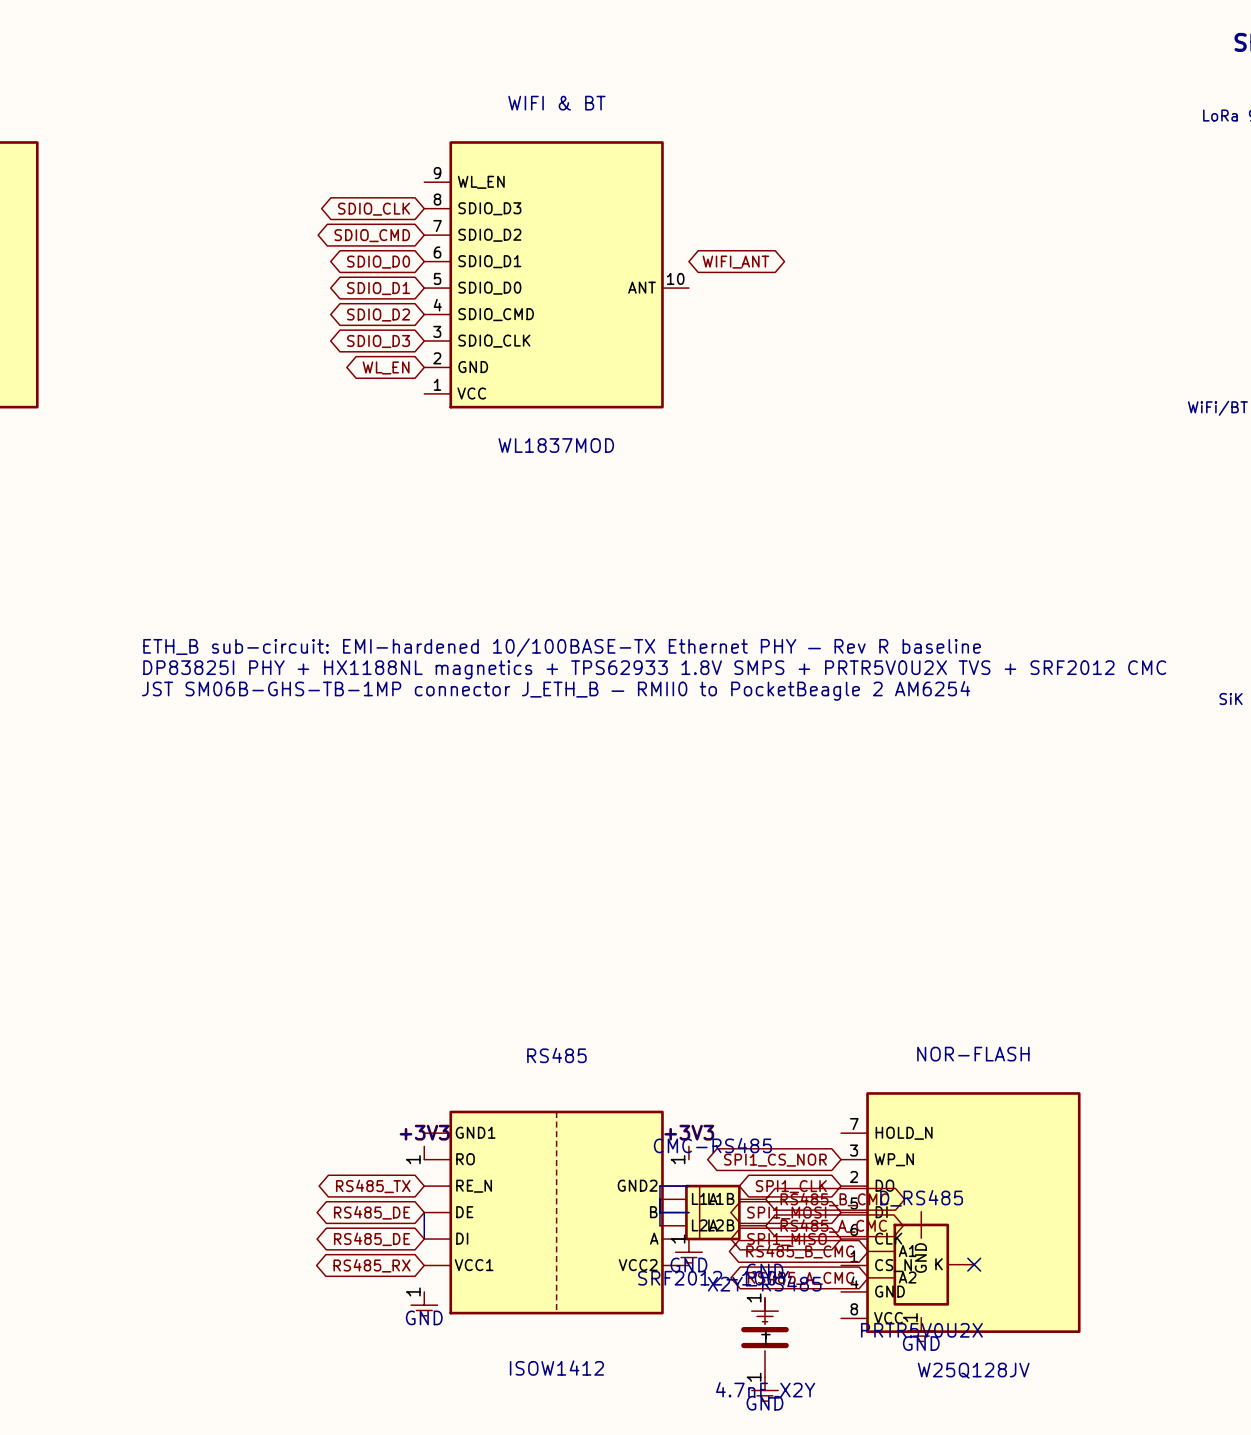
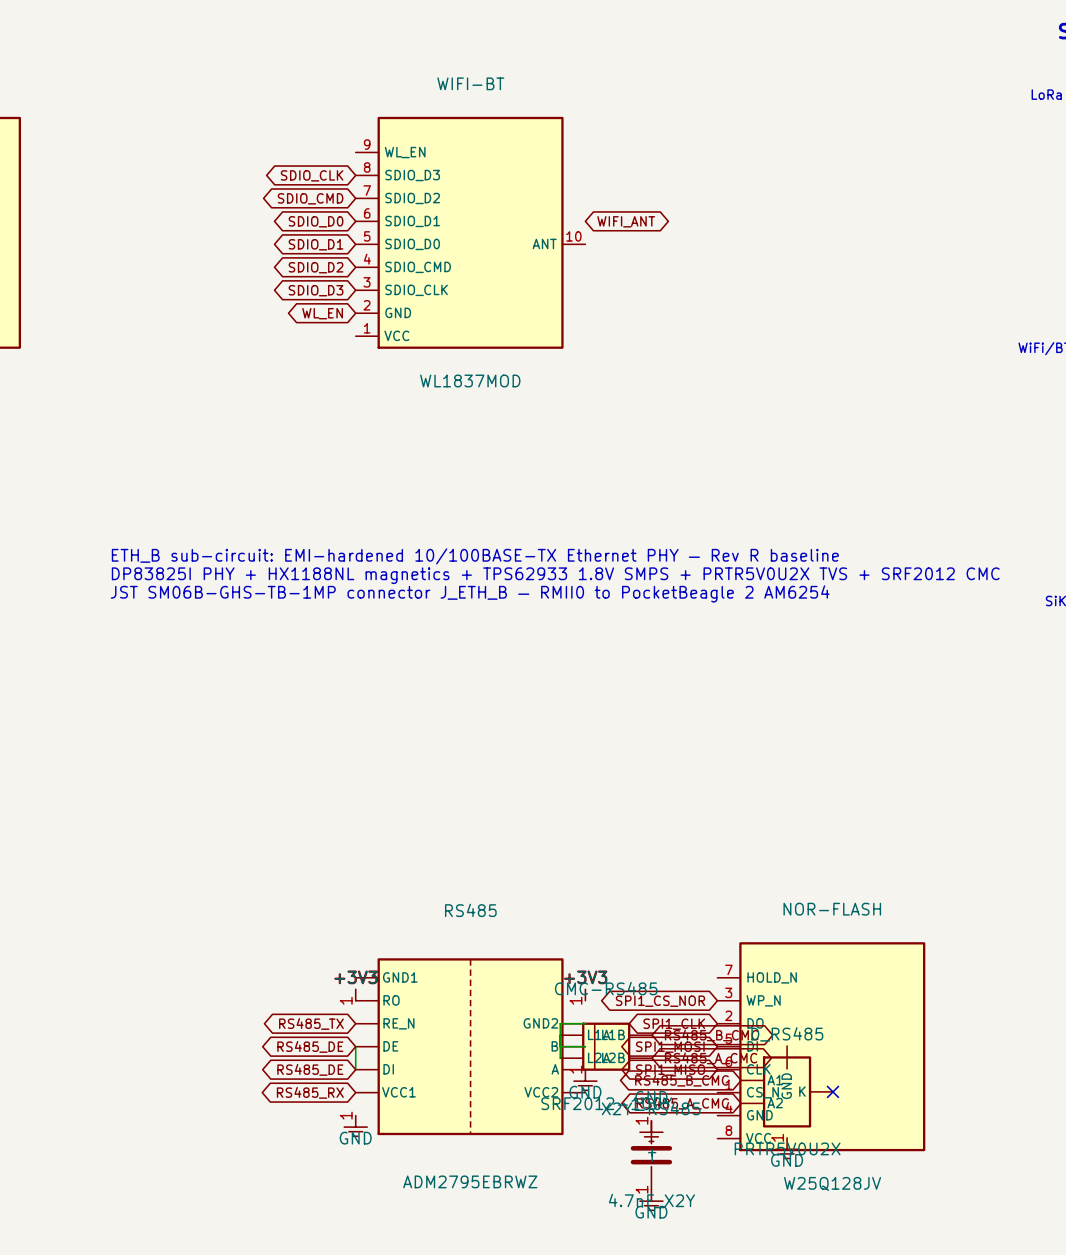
WIFI & BT name: WIFI & BT (556, 103) -> WIFI-BT (470, 83)
RS485 value: ISOW1412 (556, 1368) -> ADM2795EBRWZ (470, 1181)

